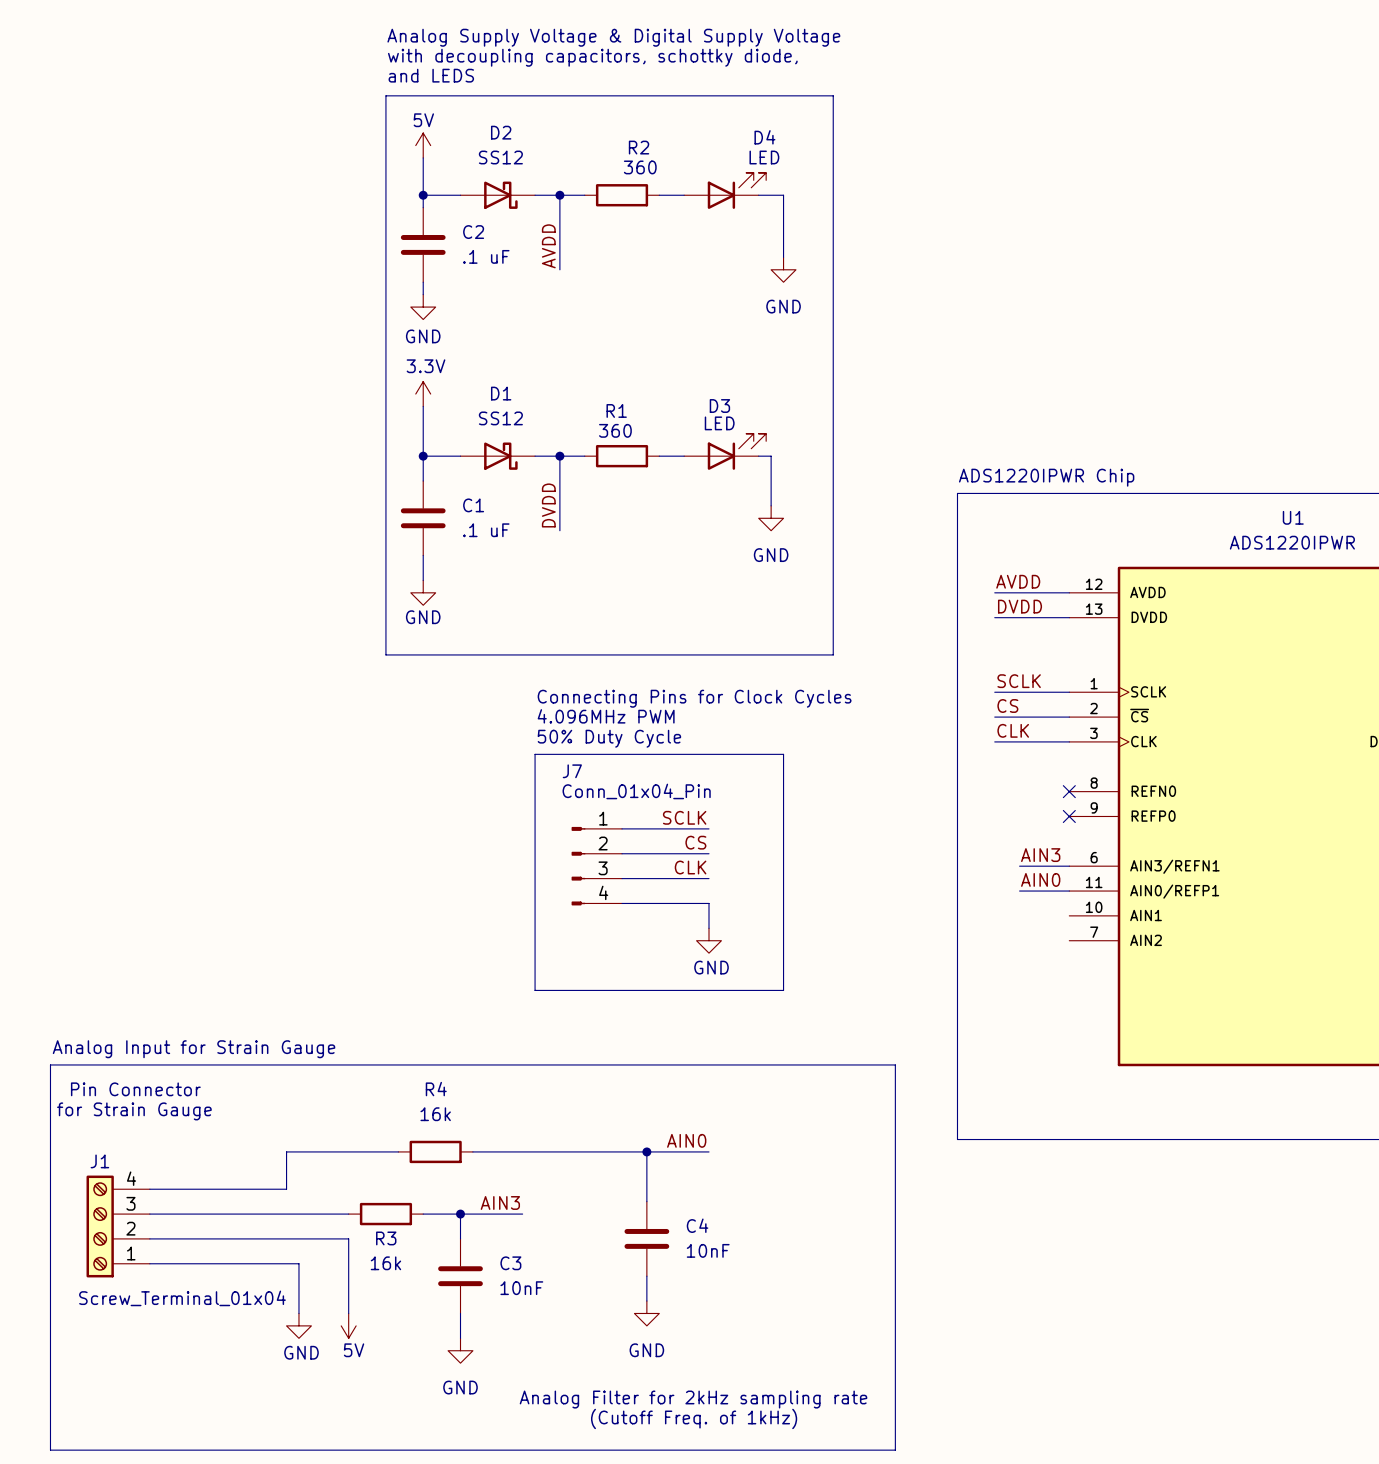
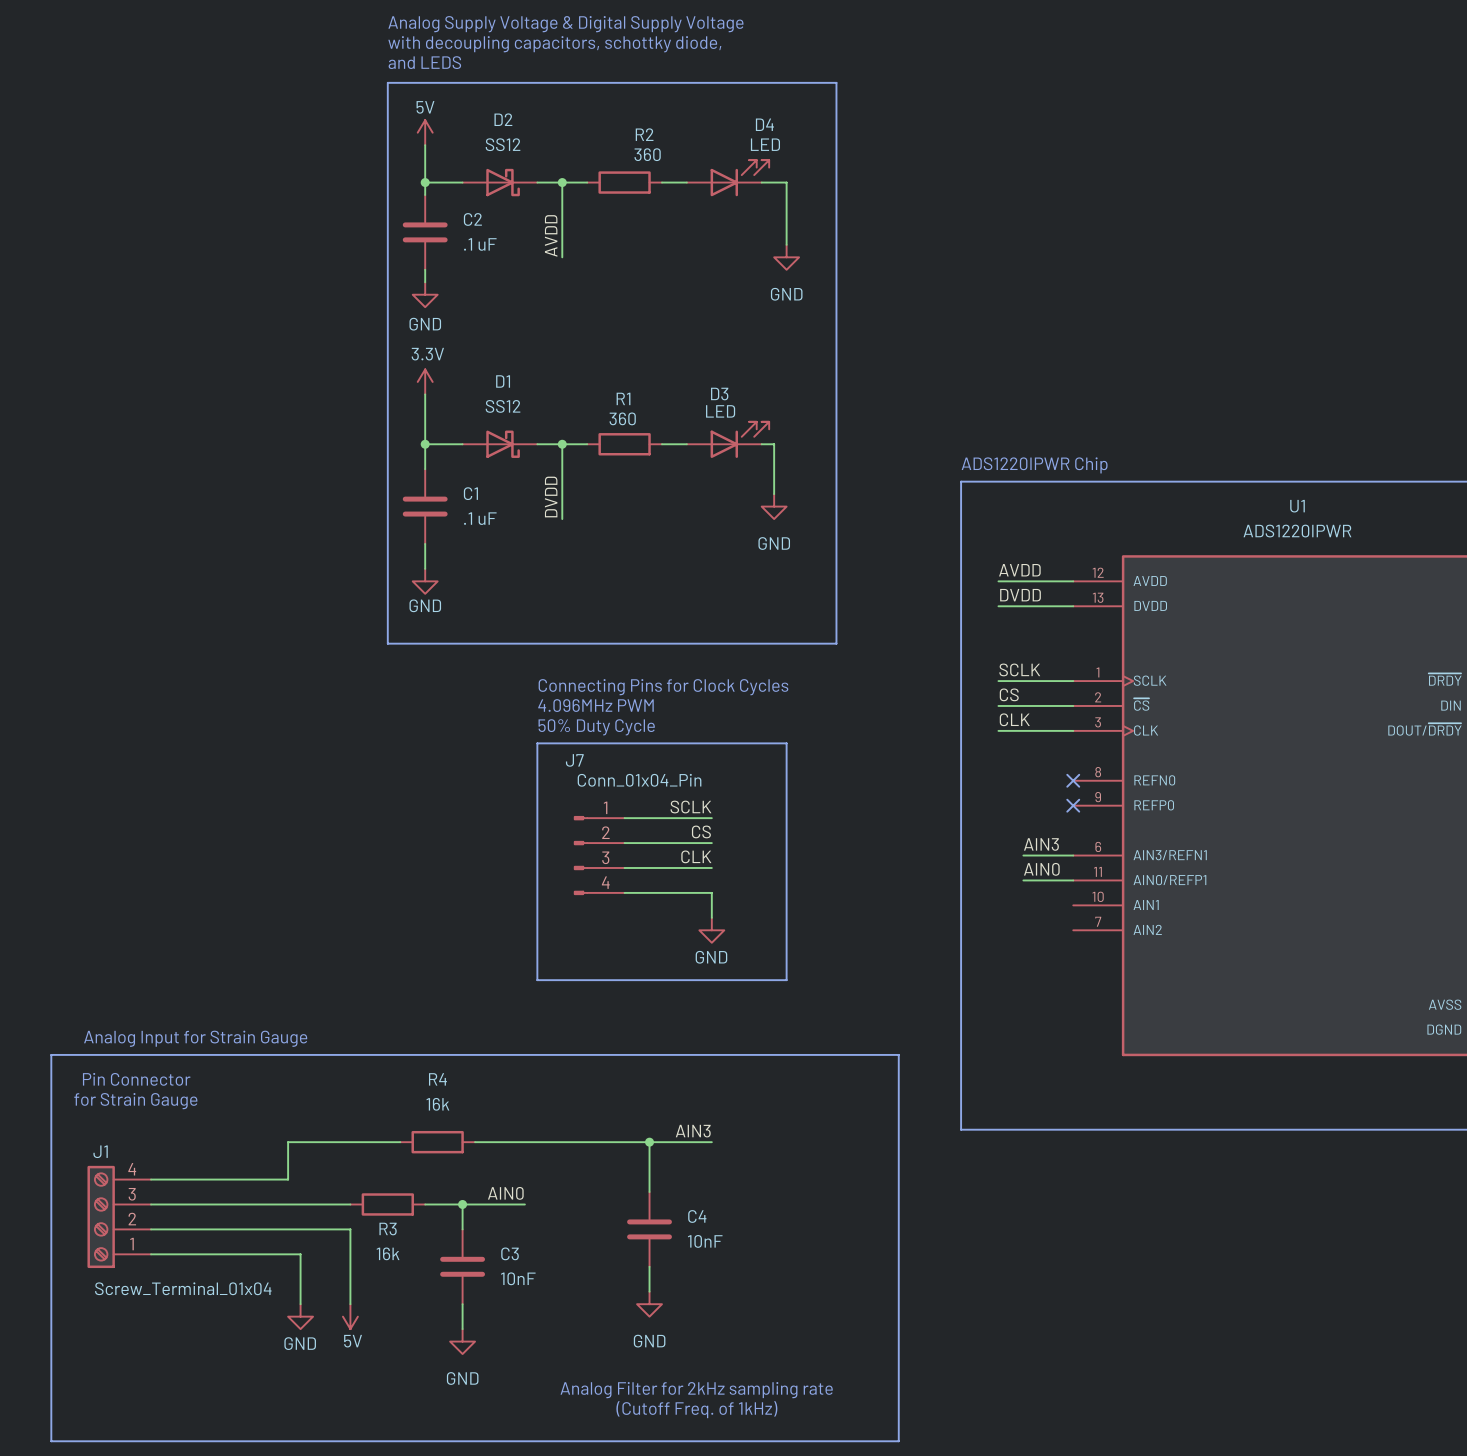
label: AIN0 (686, 1140) -> AIN3 (693, 1131)
label: AIN3 (500, 1202) -> AIN0 (505, 1193)

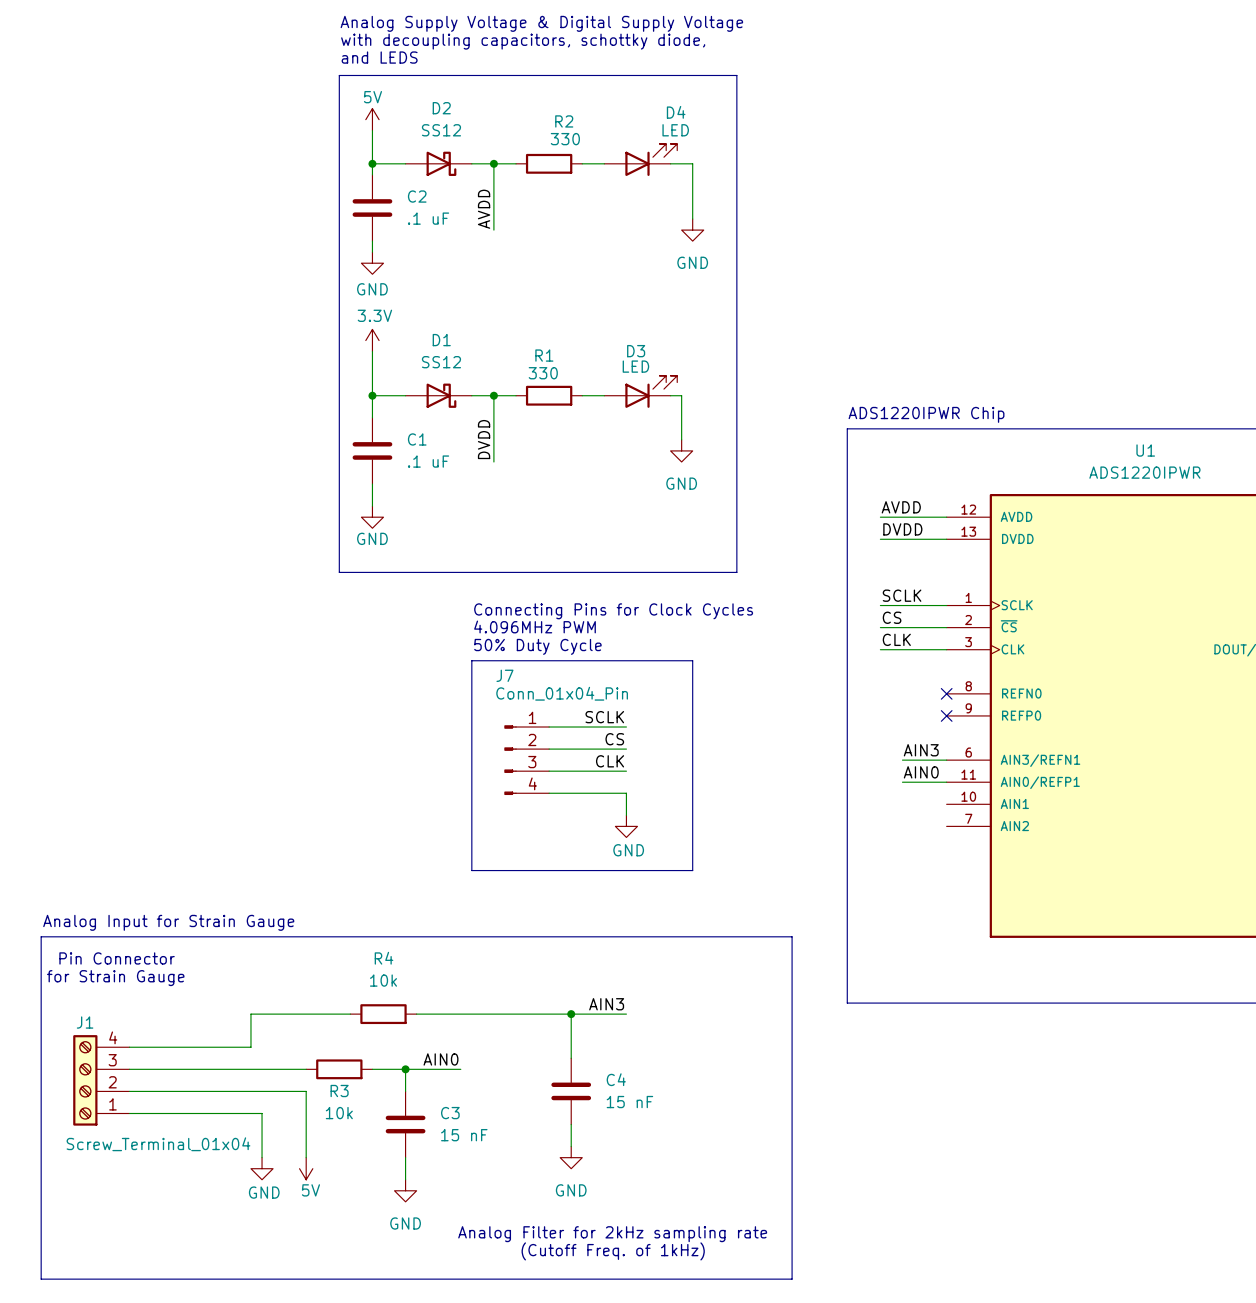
R2 value: 360 (647, 154) -> 330 (565, 139)
R1 value: 360 (622, 418) -> 330 (543, 373)
R4 value: 16k (437, 1104) -> 10k (383, 980)
C4 value: 10nF (705, 1241) -> 15 nF (629, 1102)
R3 value: 16k (388, 1253) -> 10k (339, 1113)
C3 value: 10nF (518, 1278) -> 15 nF (464, 1135)

